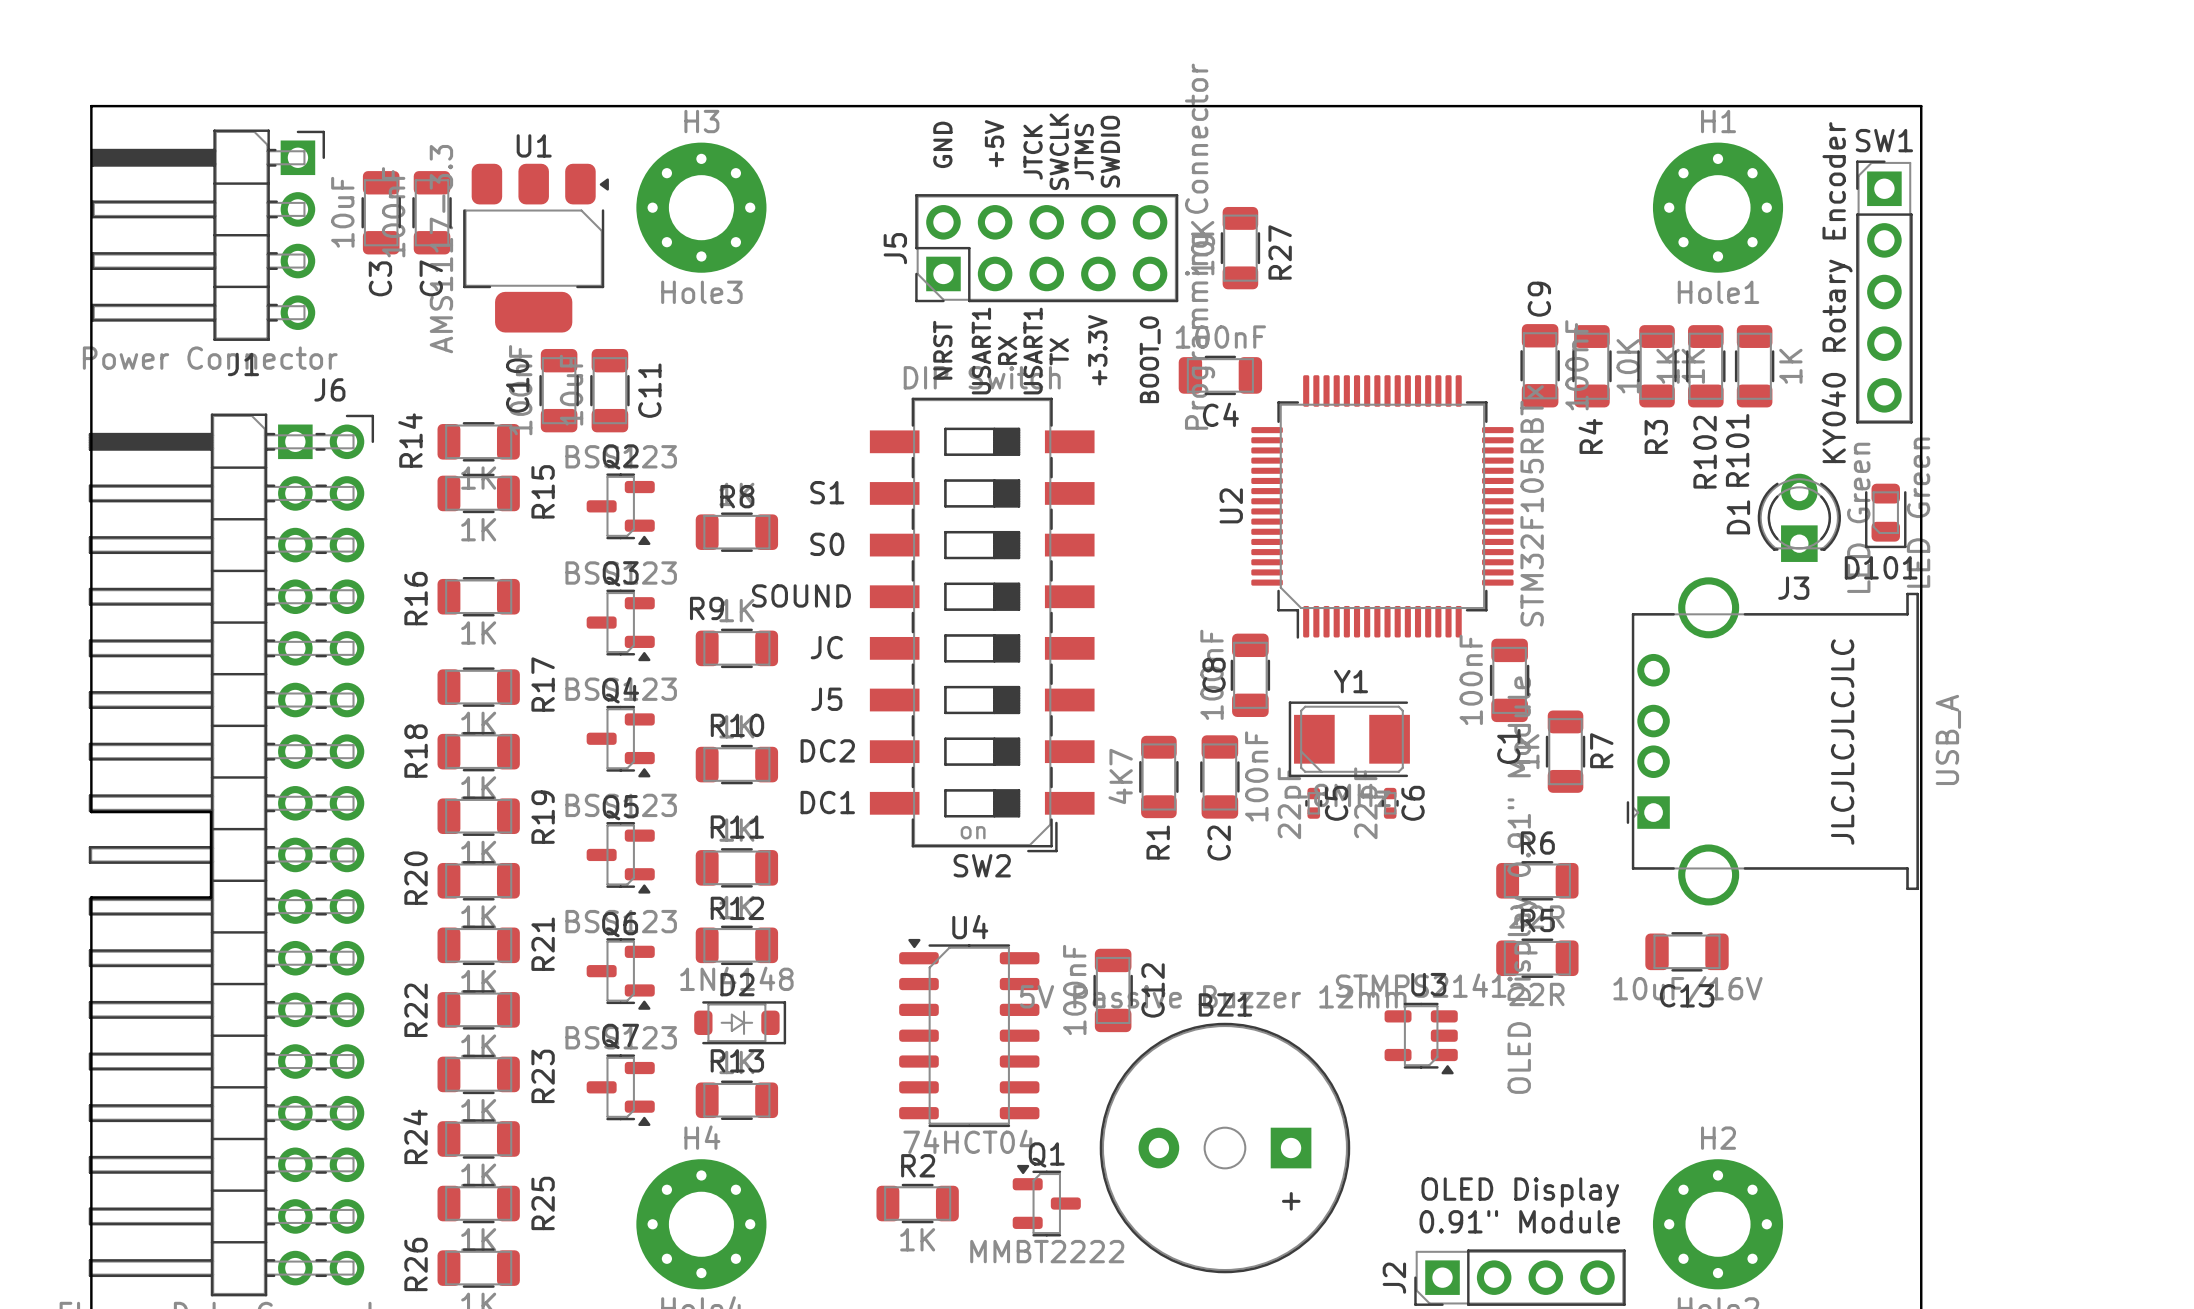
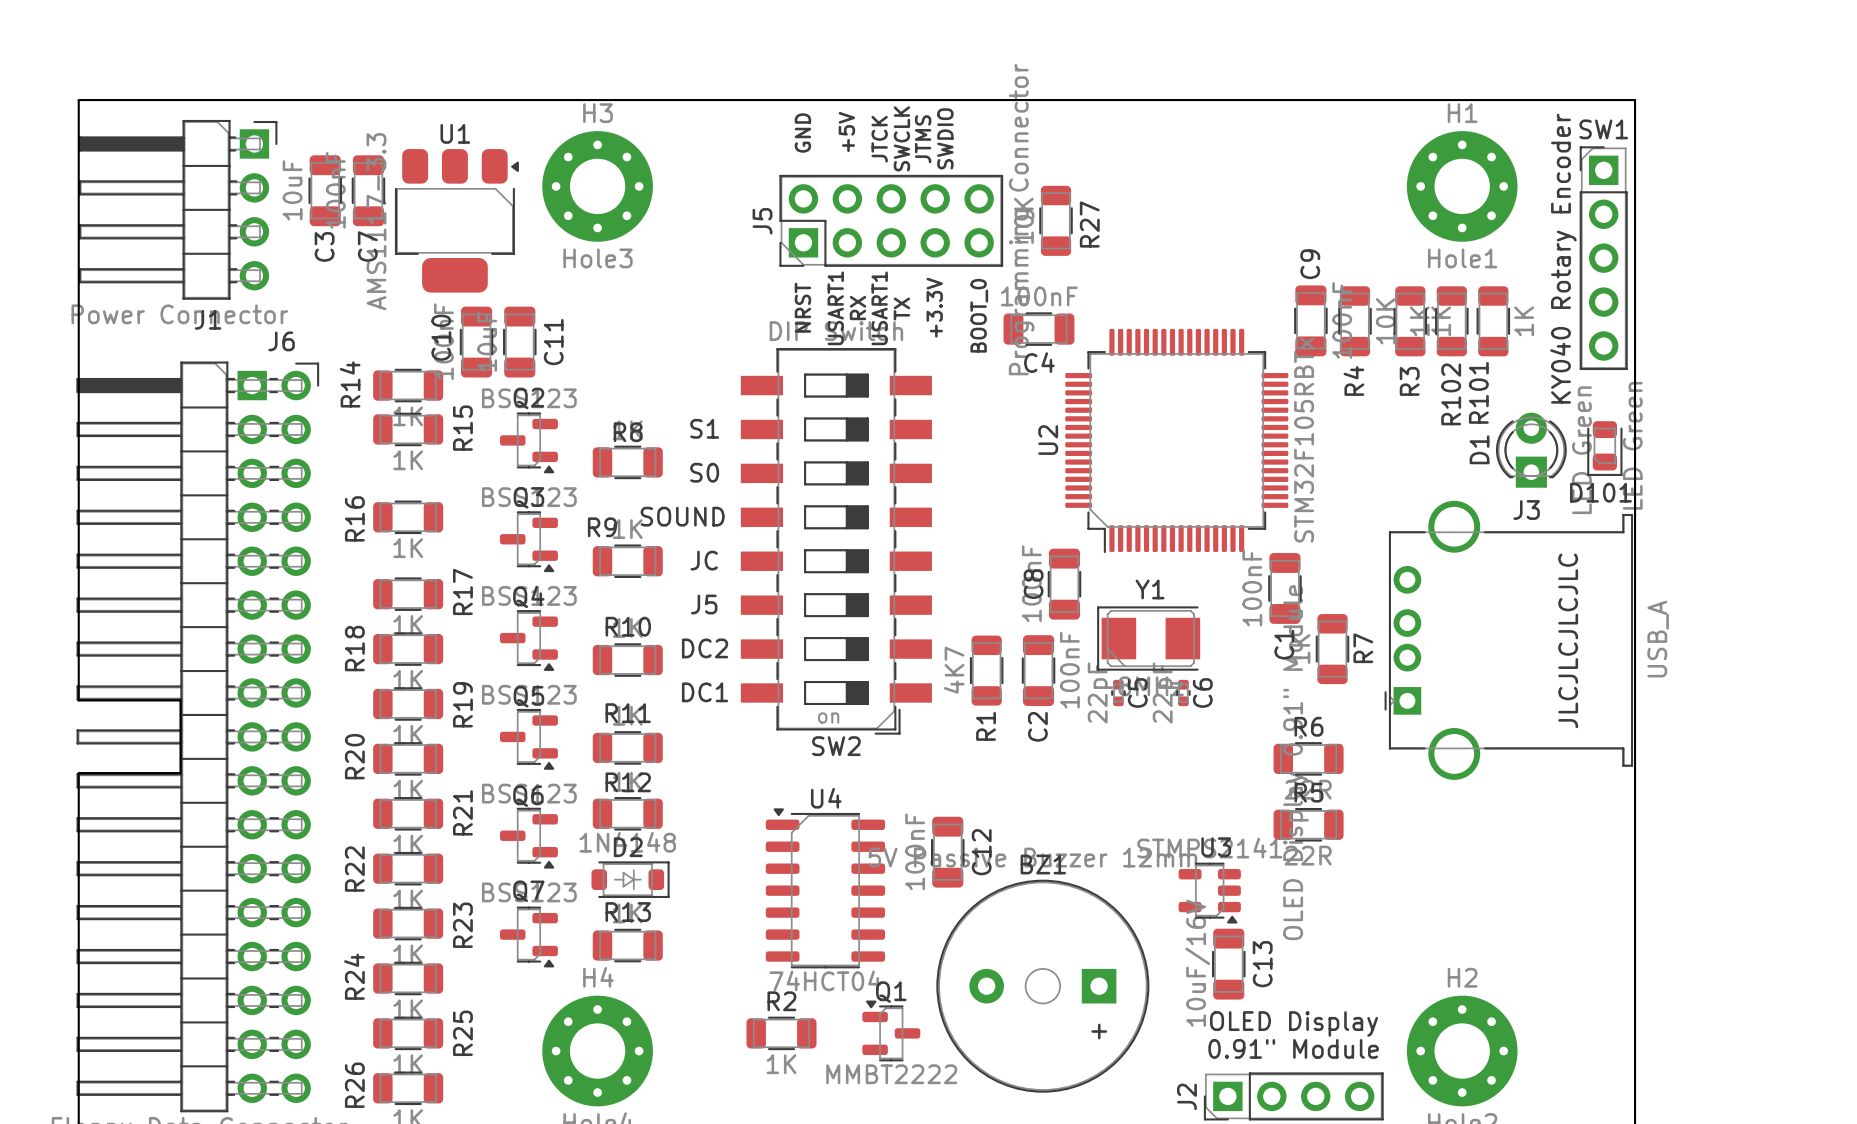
C13 rotation: 0° (1687, 951) -> 90° clockwise (1228, 964)
C13 position: (1687, 951) -> (1228, 964)
C13 name position: C13 (1687, 995) -> C13 (1262, 964)

